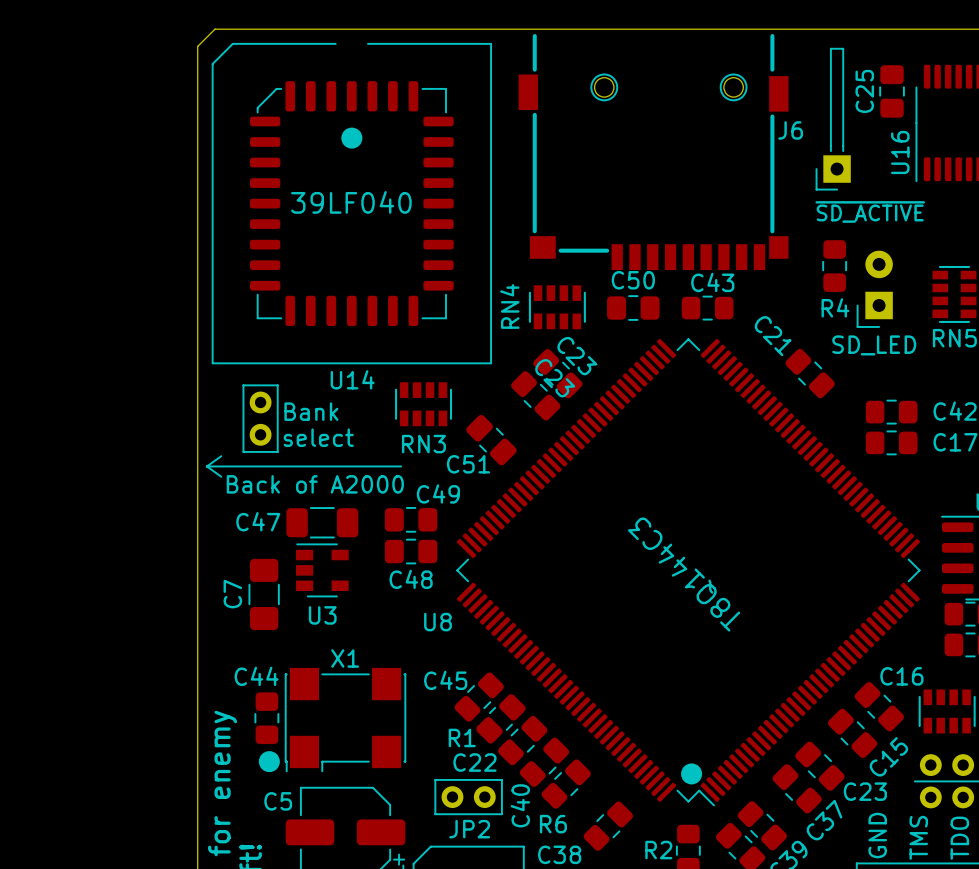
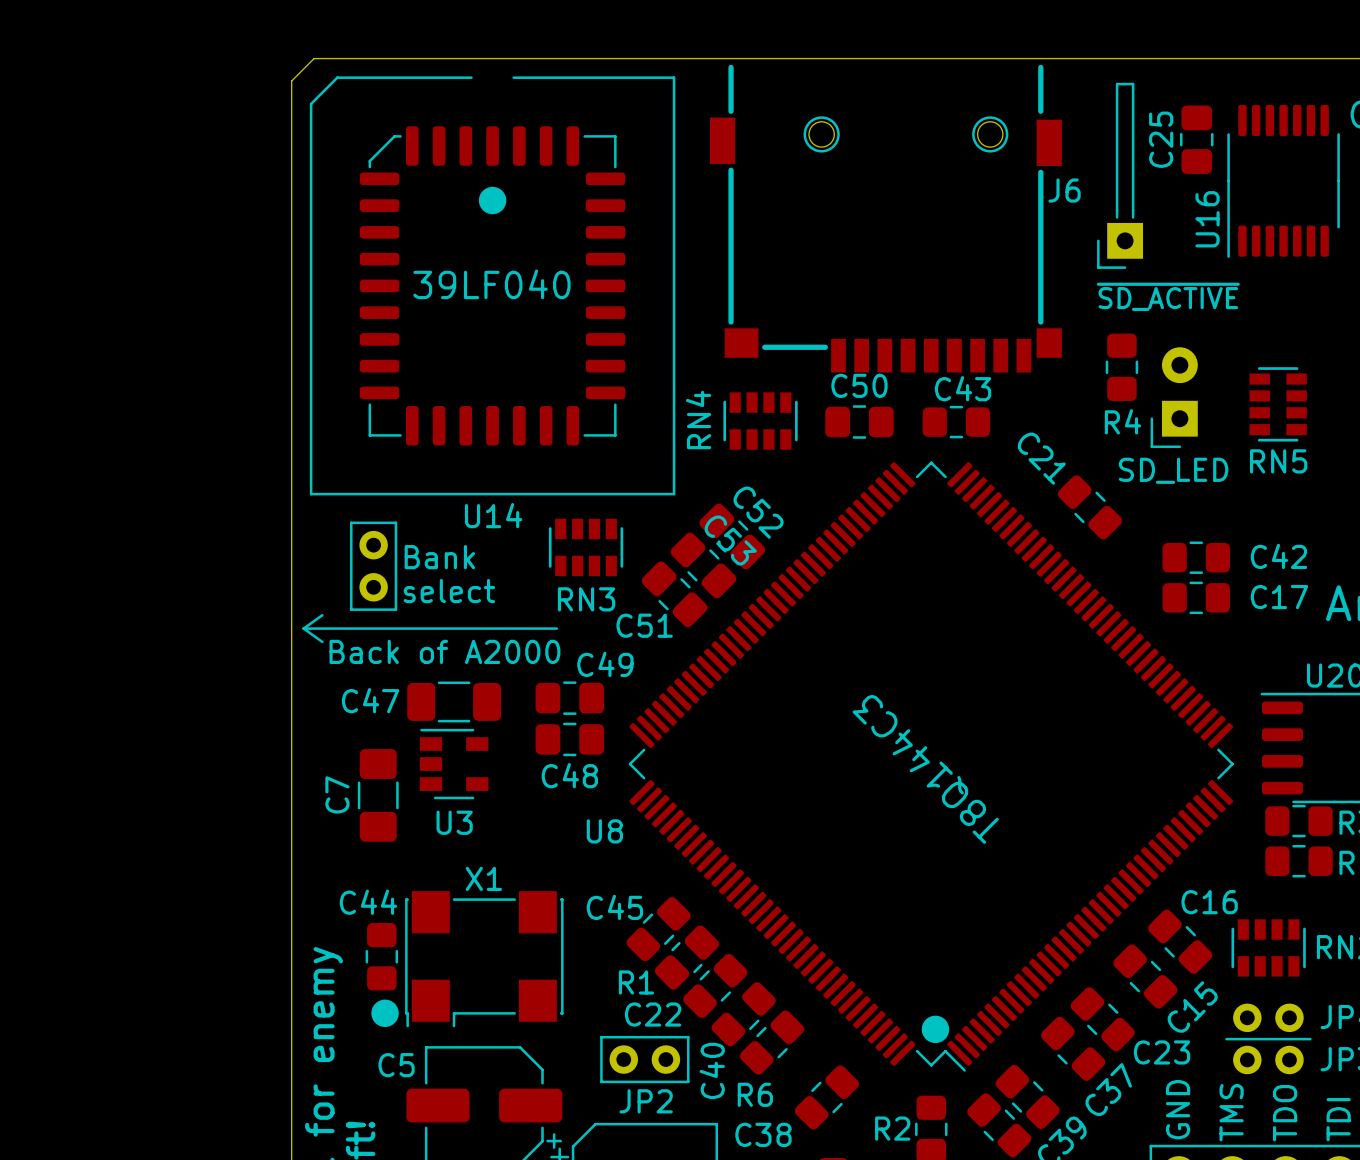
C23: (557, 373) -> none
C23: (535, 395) -> none
C52: none -> (732, 536)
C53: none -> (703, 565)

